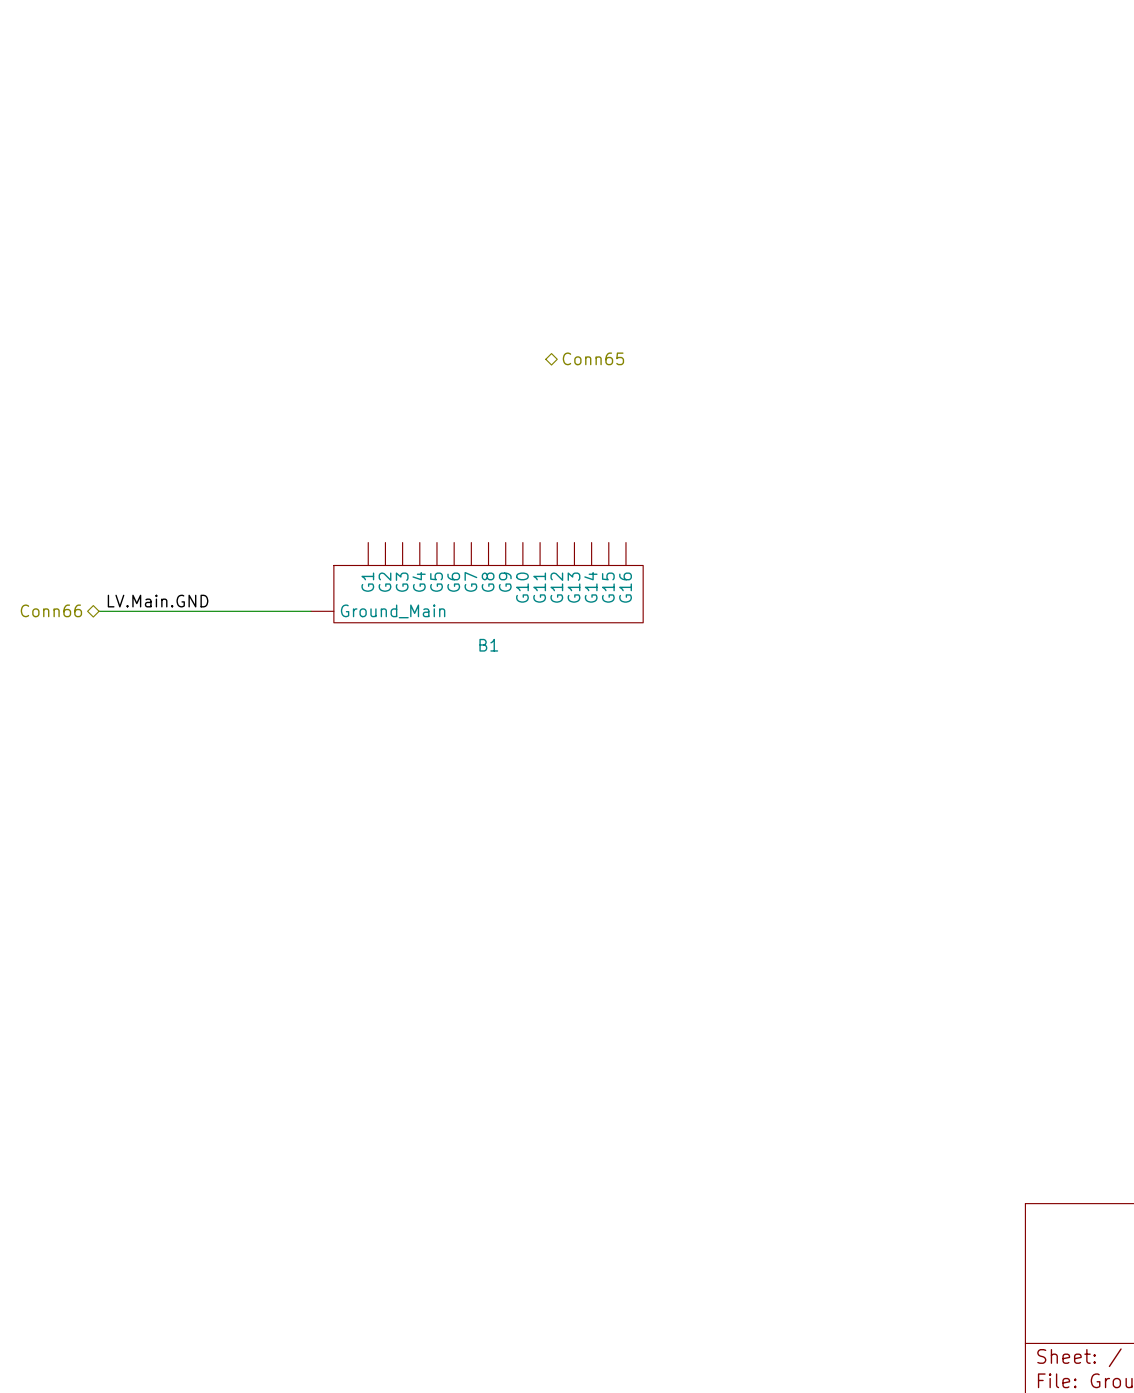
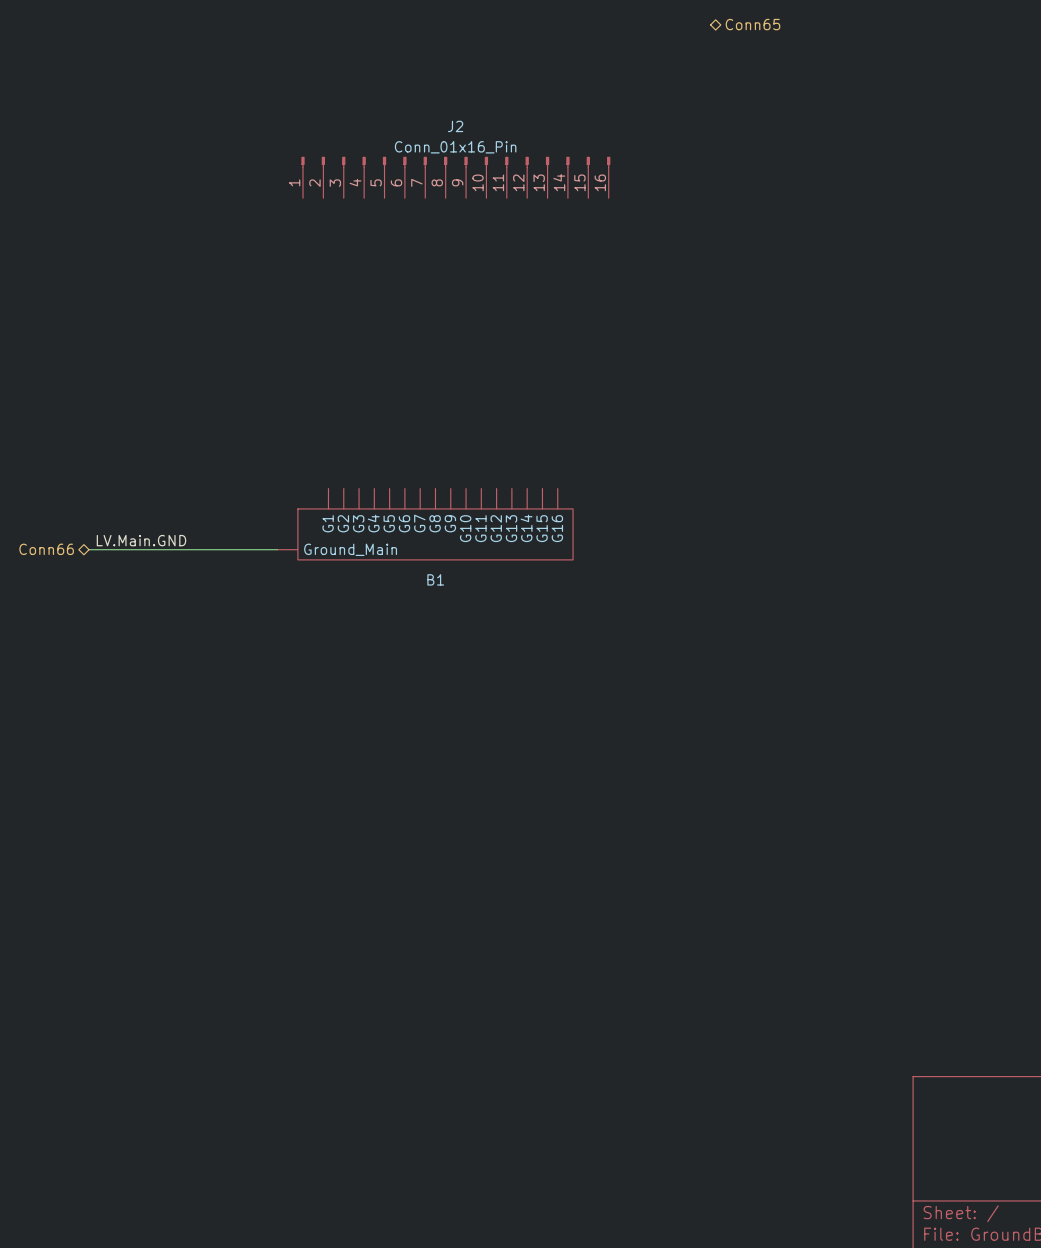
hierarchical label: none -> Conn65 (752, 24)
J2: none -> Conn_01x16_Pin (455, 177)
hierarchical label: Conn65 (593, 358) -> none

